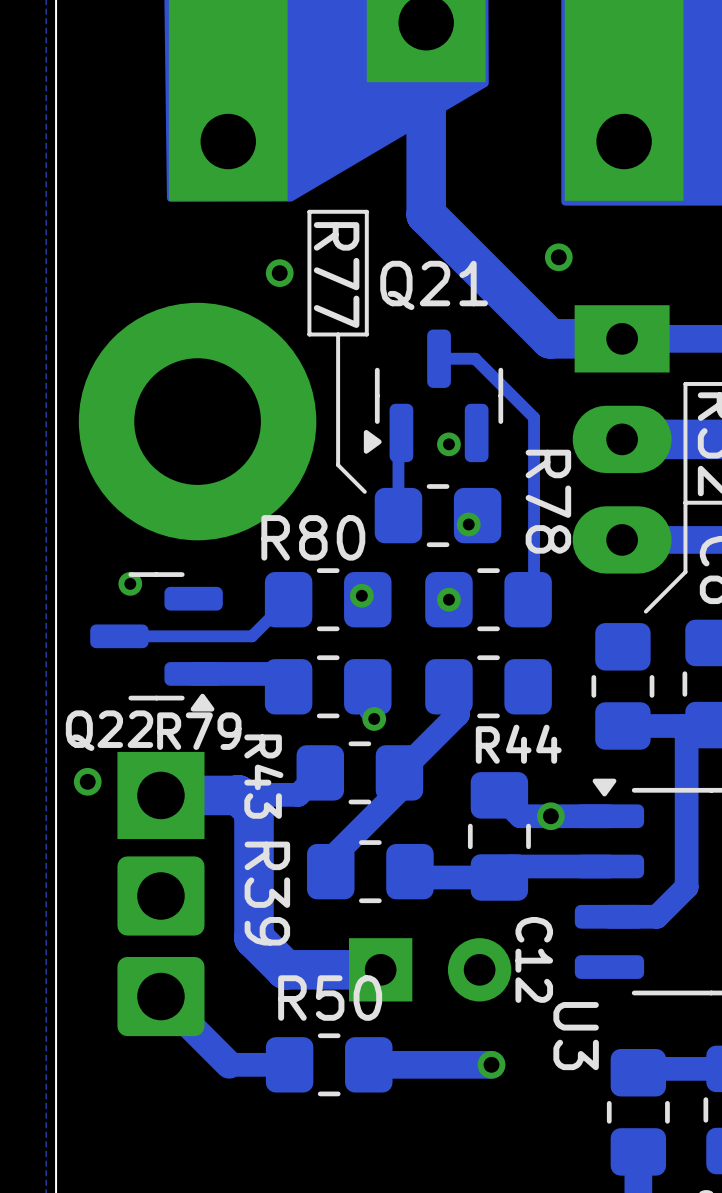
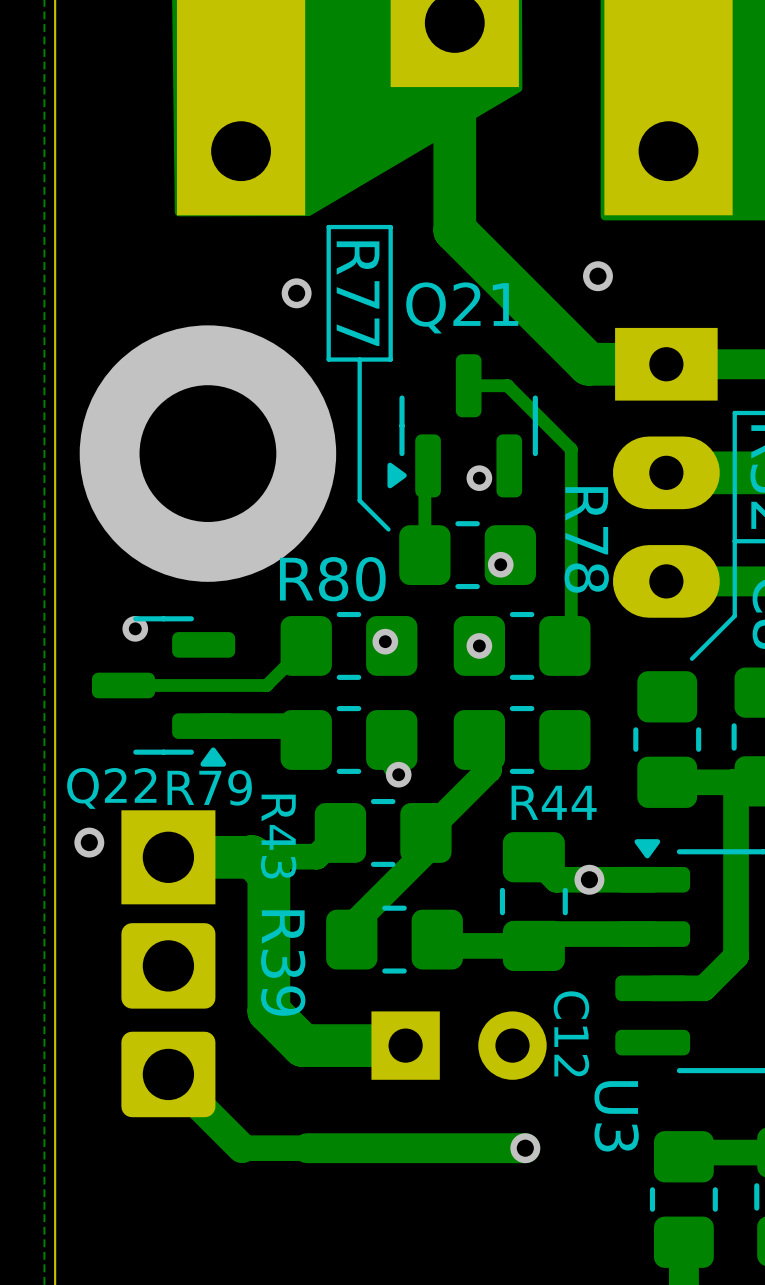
R50: (329, 1064) -> none
track: none -> (392, 1148) (307, 1148)

